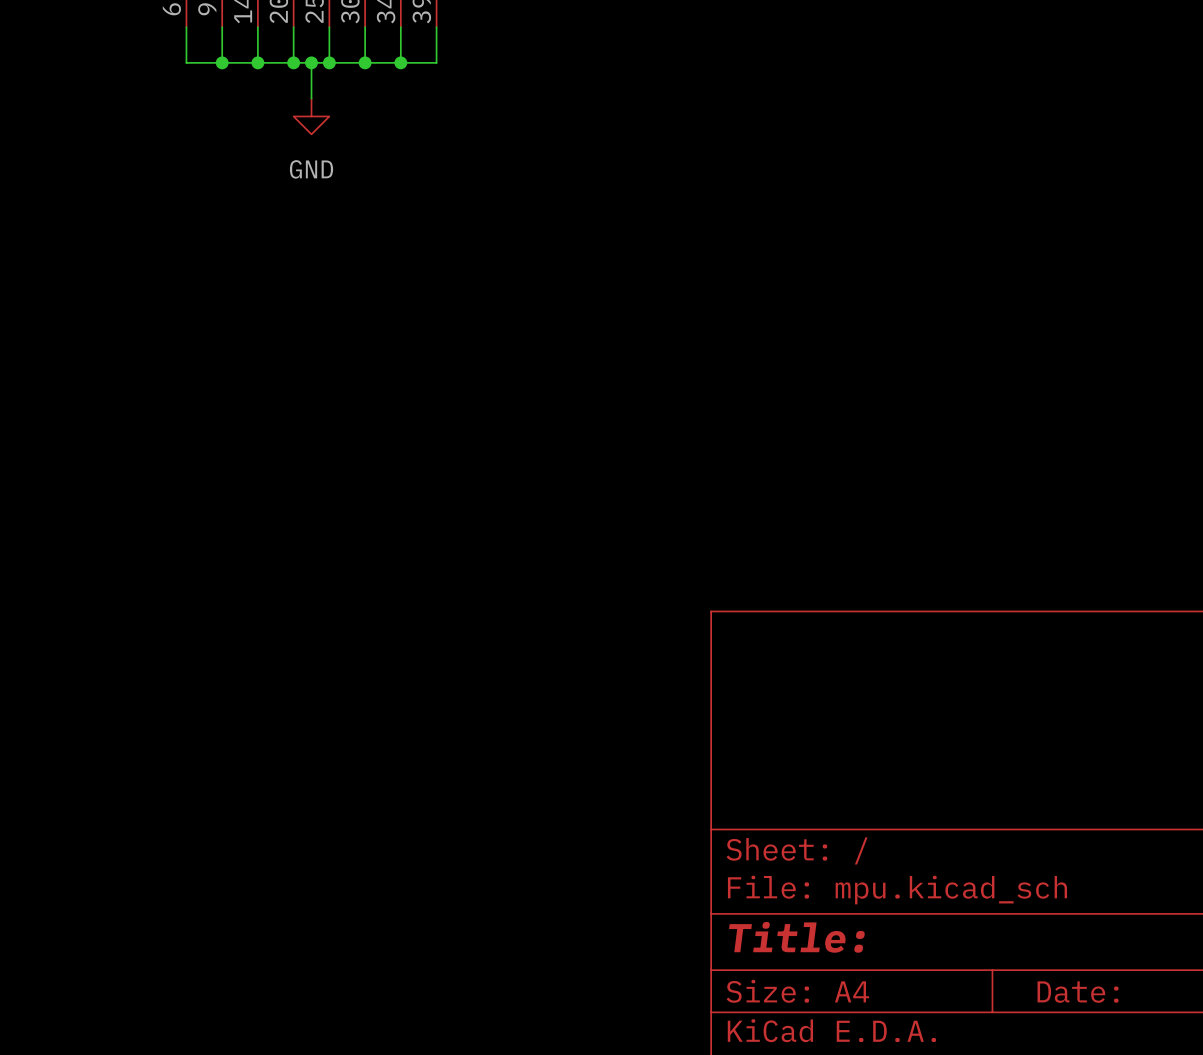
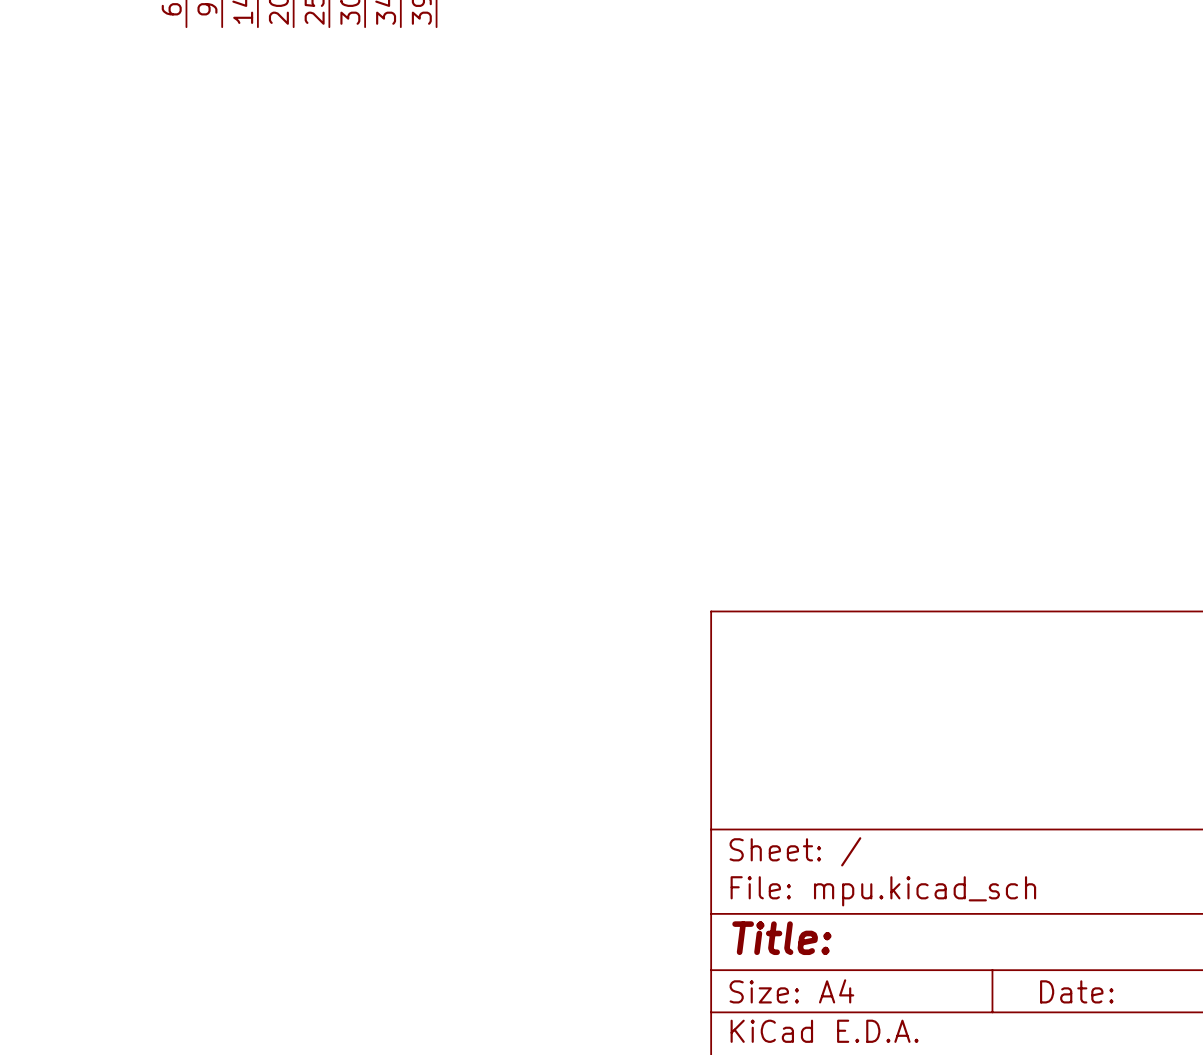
wire: (186, 27) (186, 62) (436, 62) (436, 27) -> none
wire: (222, 27) (222, 62) -> none
wire: (257, 27) (257, 62) -> none
wire: (293, 27) (293, 62) -> none
wire: (329, 27) (329, 62) -> none
wire: (365, 27) (365, 62) -> none
wire: (400, 27) (400, 62) -> none
junction: (222, 62) -> none
junction: (257, 62) -> none
junction: (293, 62) -> none
wire: (311, 62) (311, 98) -> none
junction: (311, 62) -> none
junction: (329, 62) -> none
junction: (365, 62) -> none
junction: (400, 62) -> none
power symbol: GND (311, 116) -> none

